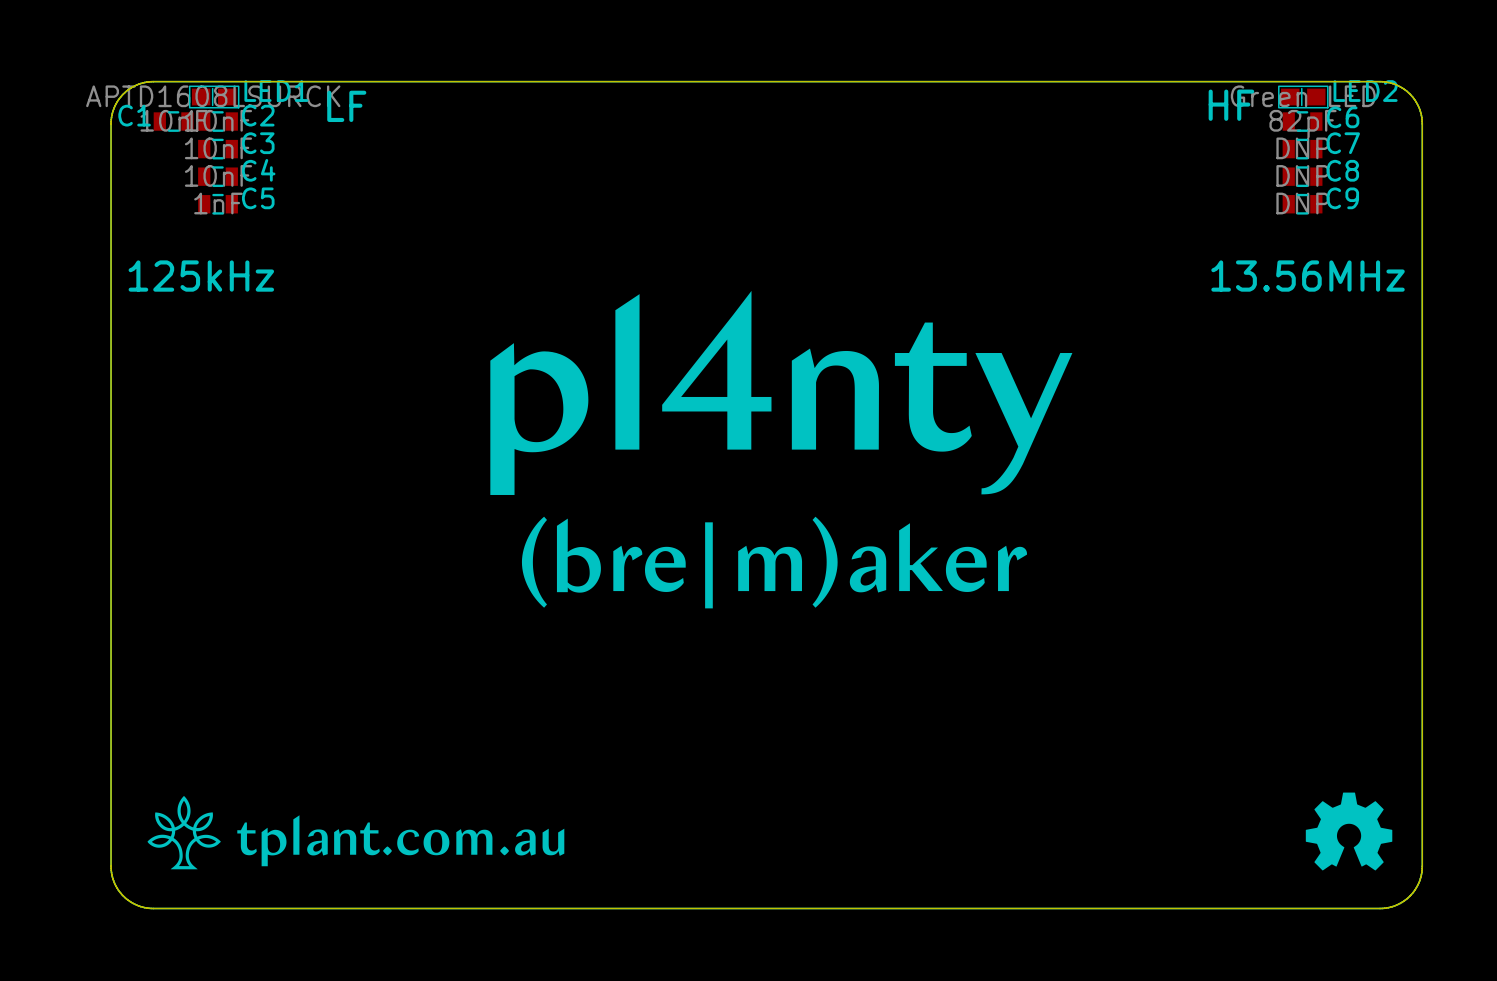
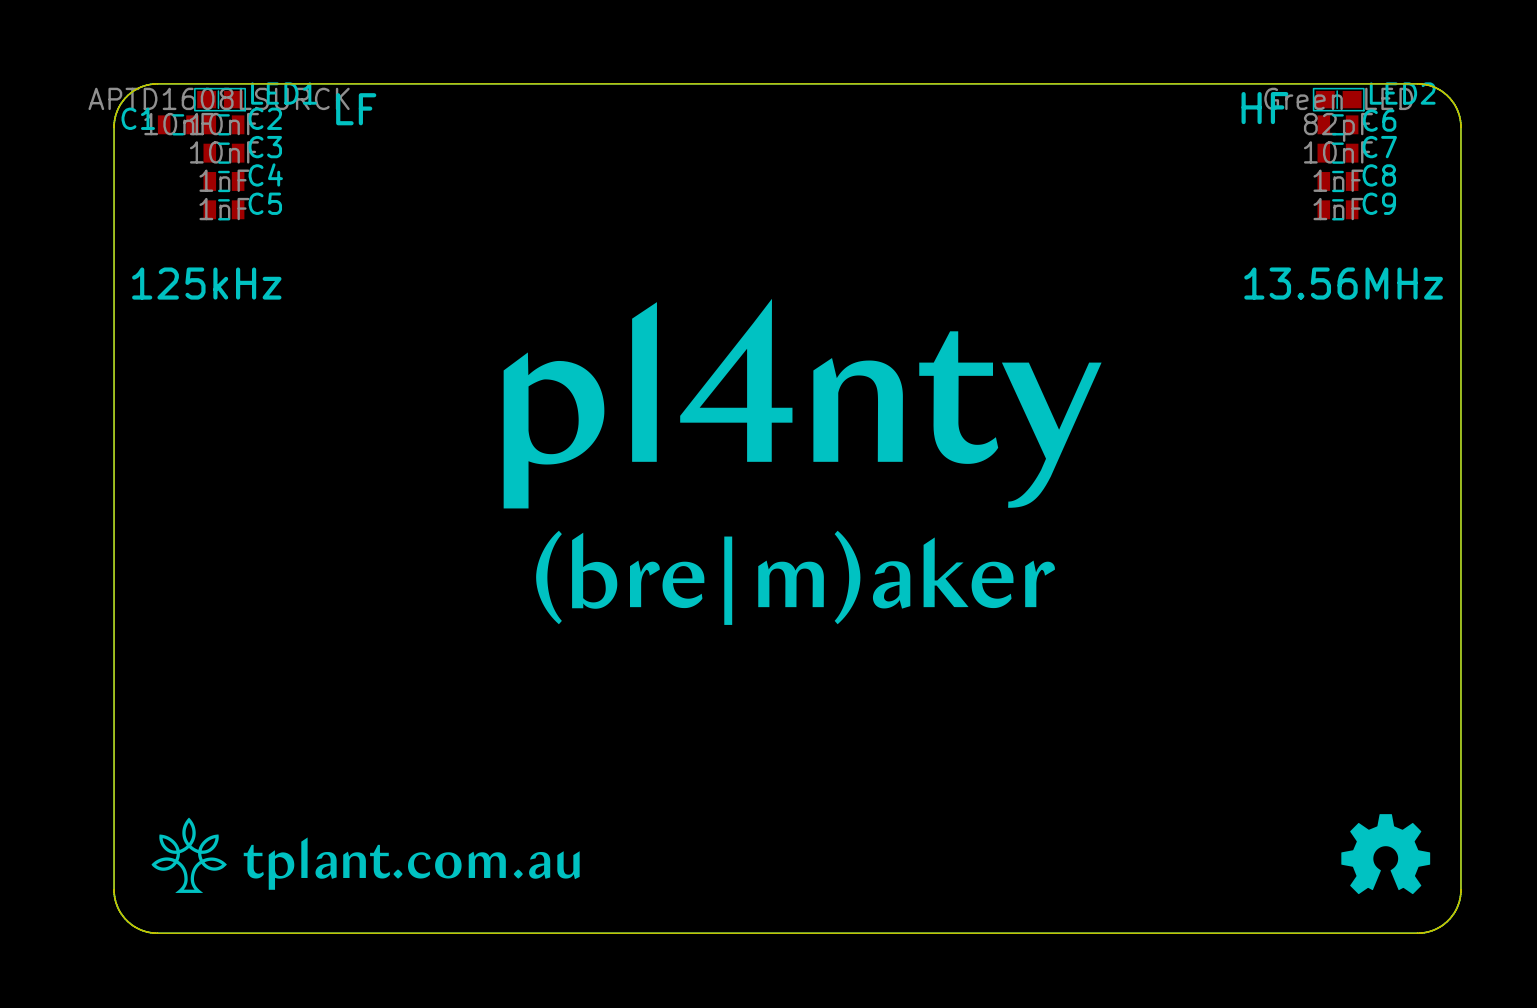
C7 value: DNP (1303, 148) -> 10nF (1338, 152)
C4 value: 10nF (218, 175) -> 1nF (224, 180)
C8 value: DNP (1303, 175) -> 1nF (1338, 180)
C9 value: DNP (1303, 203) -> 1nF (1338, 209)

